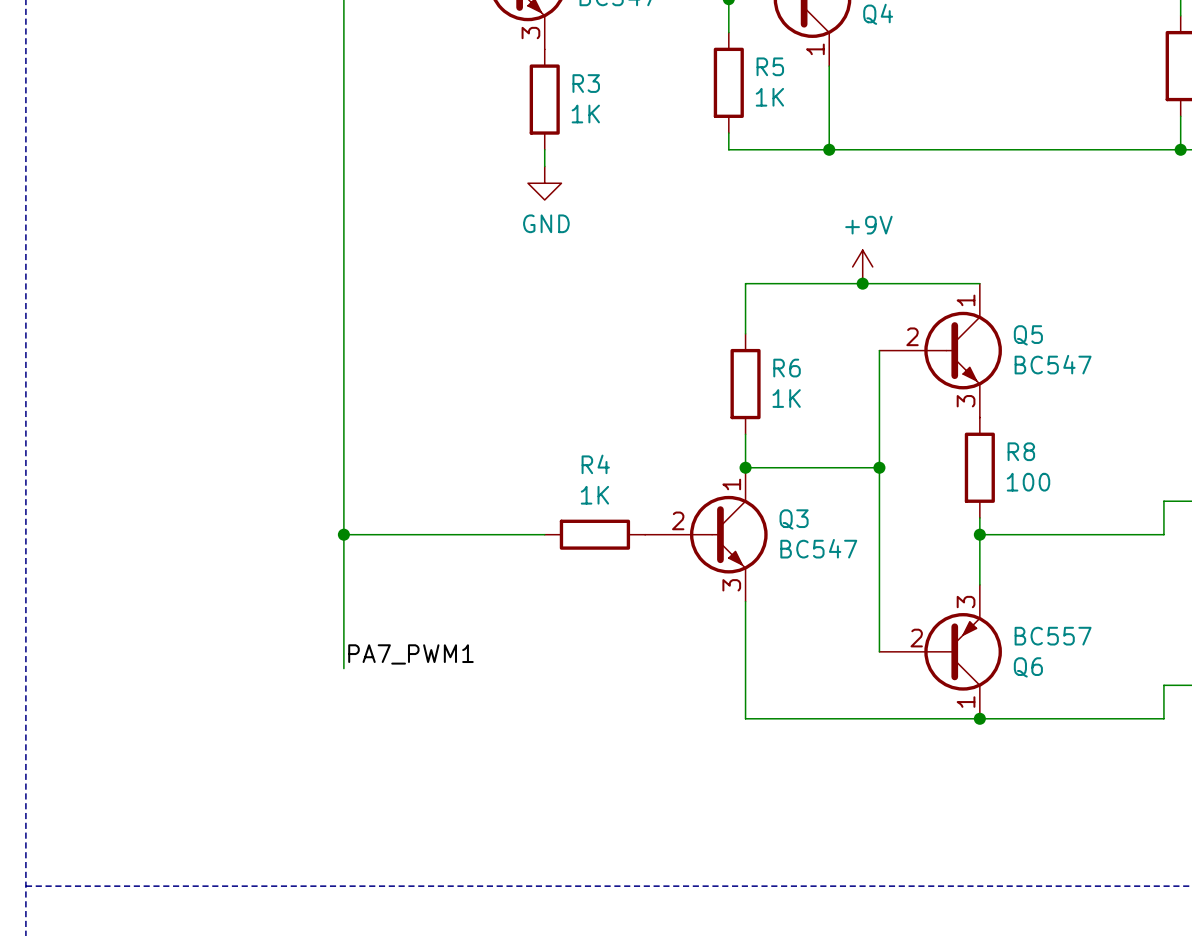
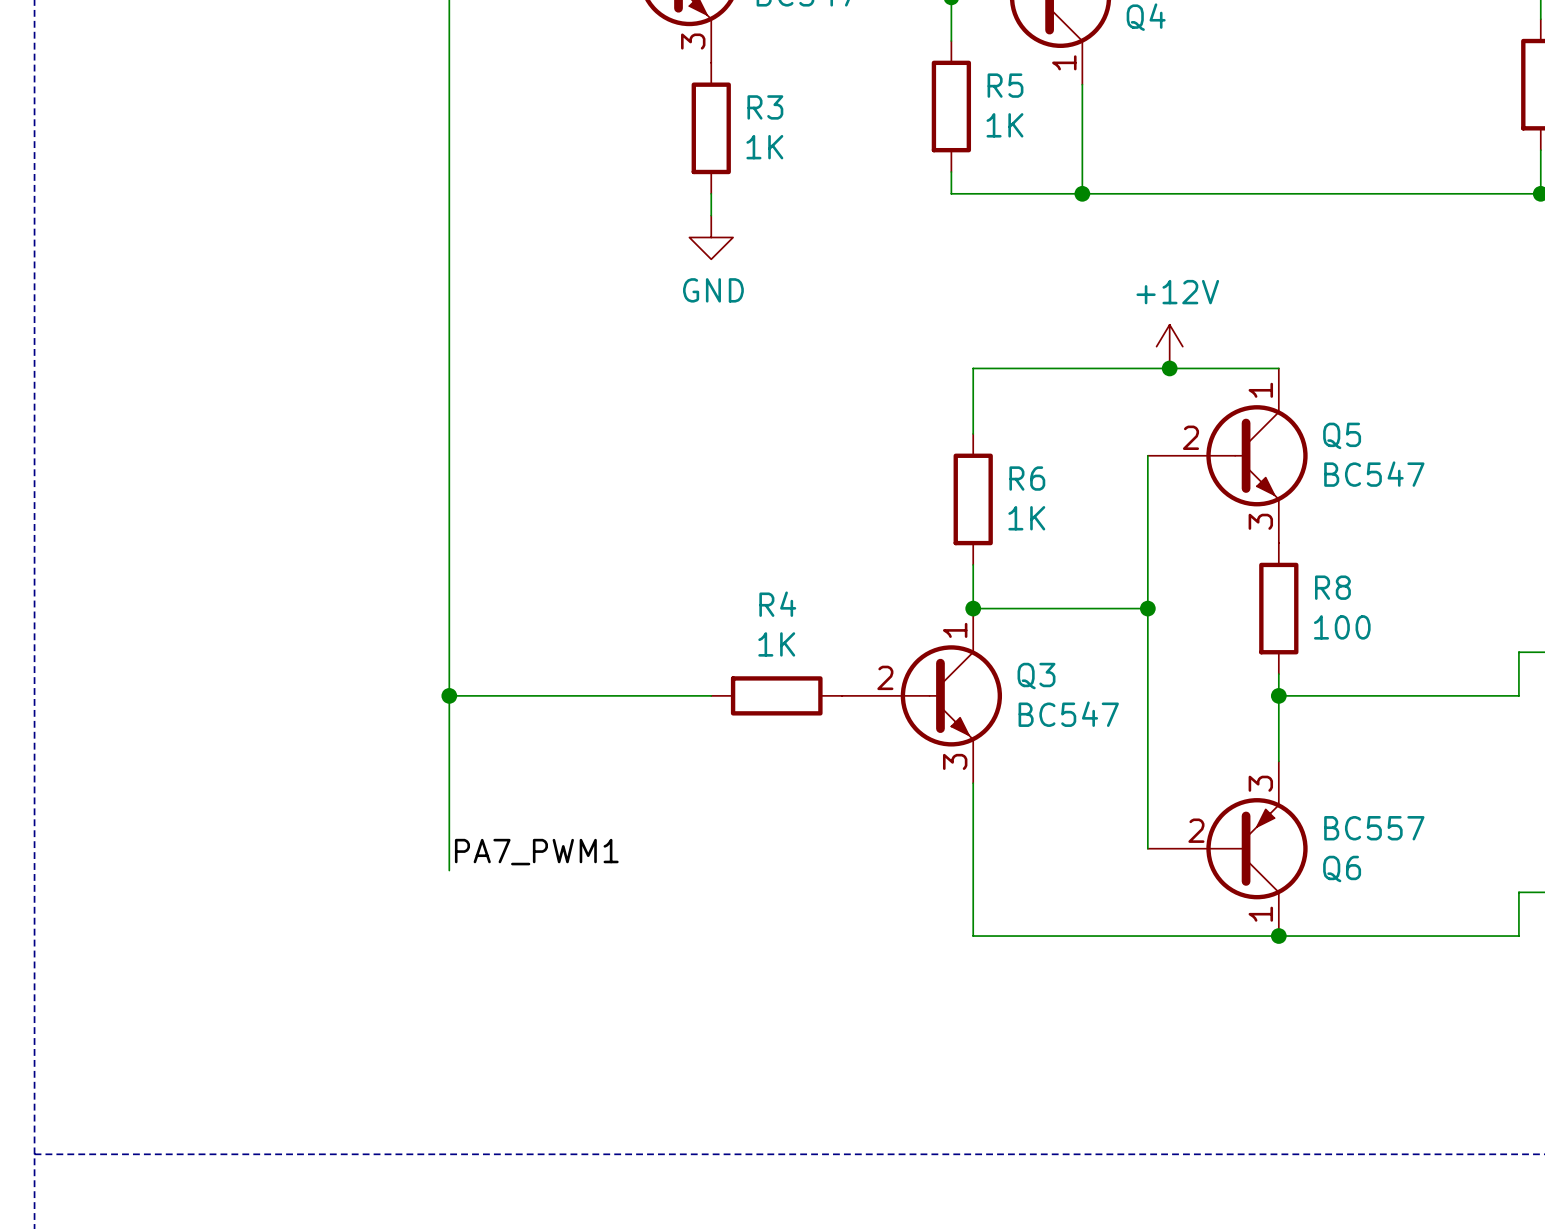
power symbol: +9V (862, 266) -> none
power symbol: none -> +12V (1169, 346)
junction position: (862, 283) -> (1169, 368)

